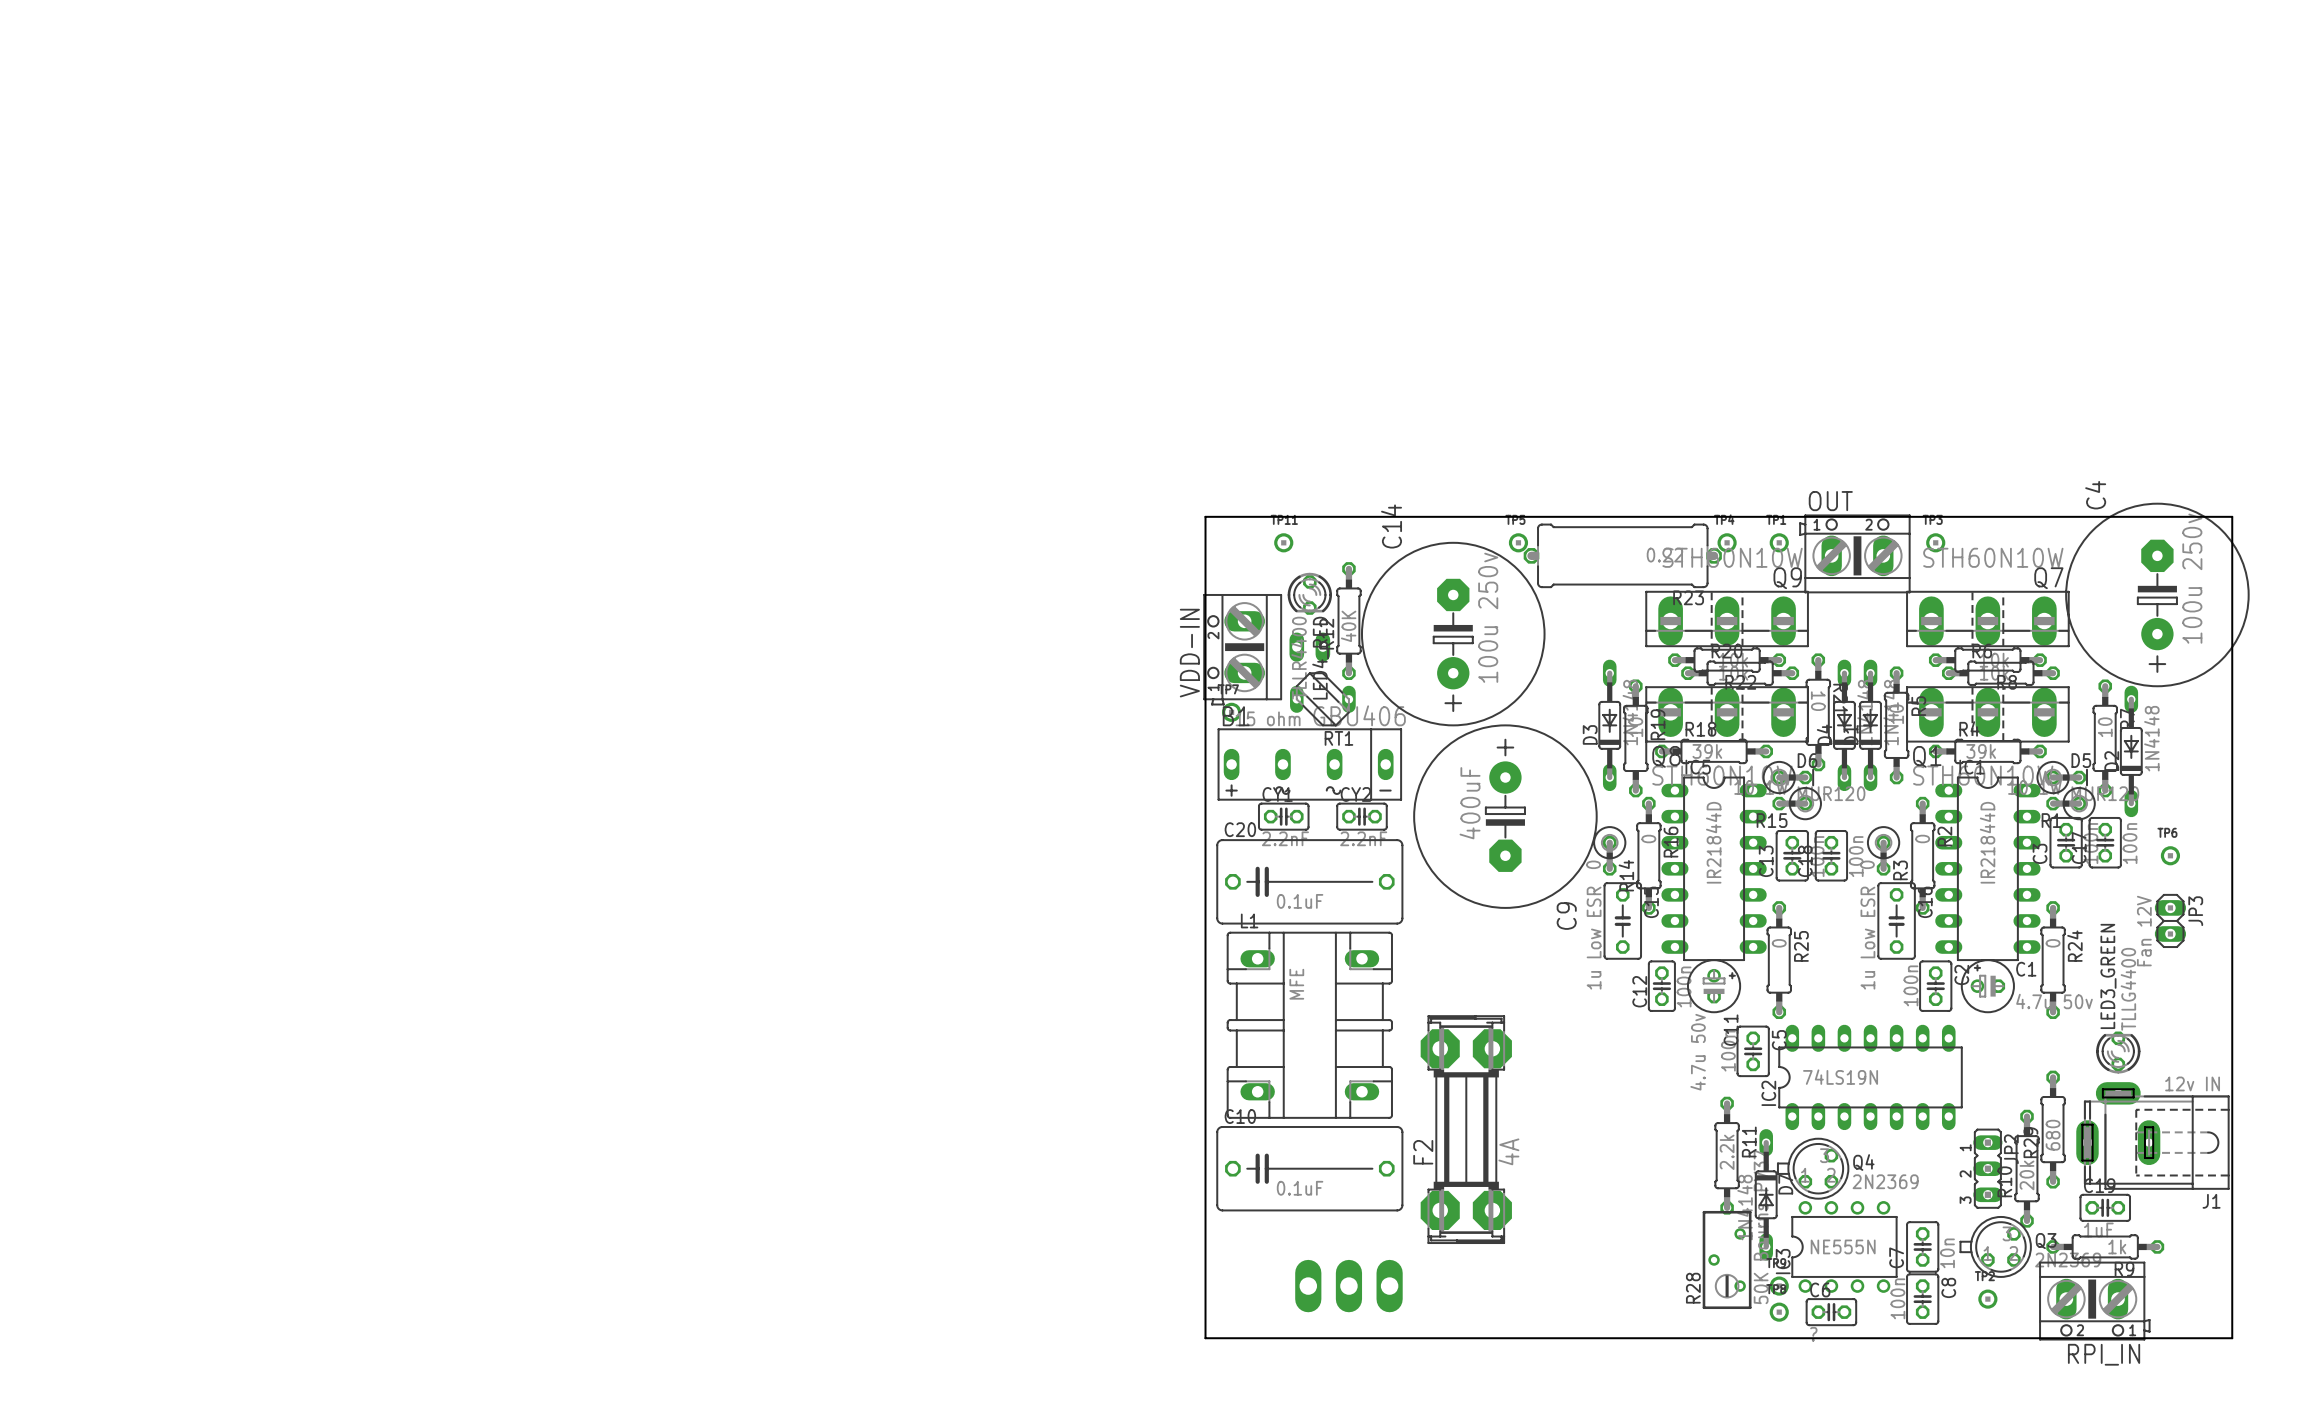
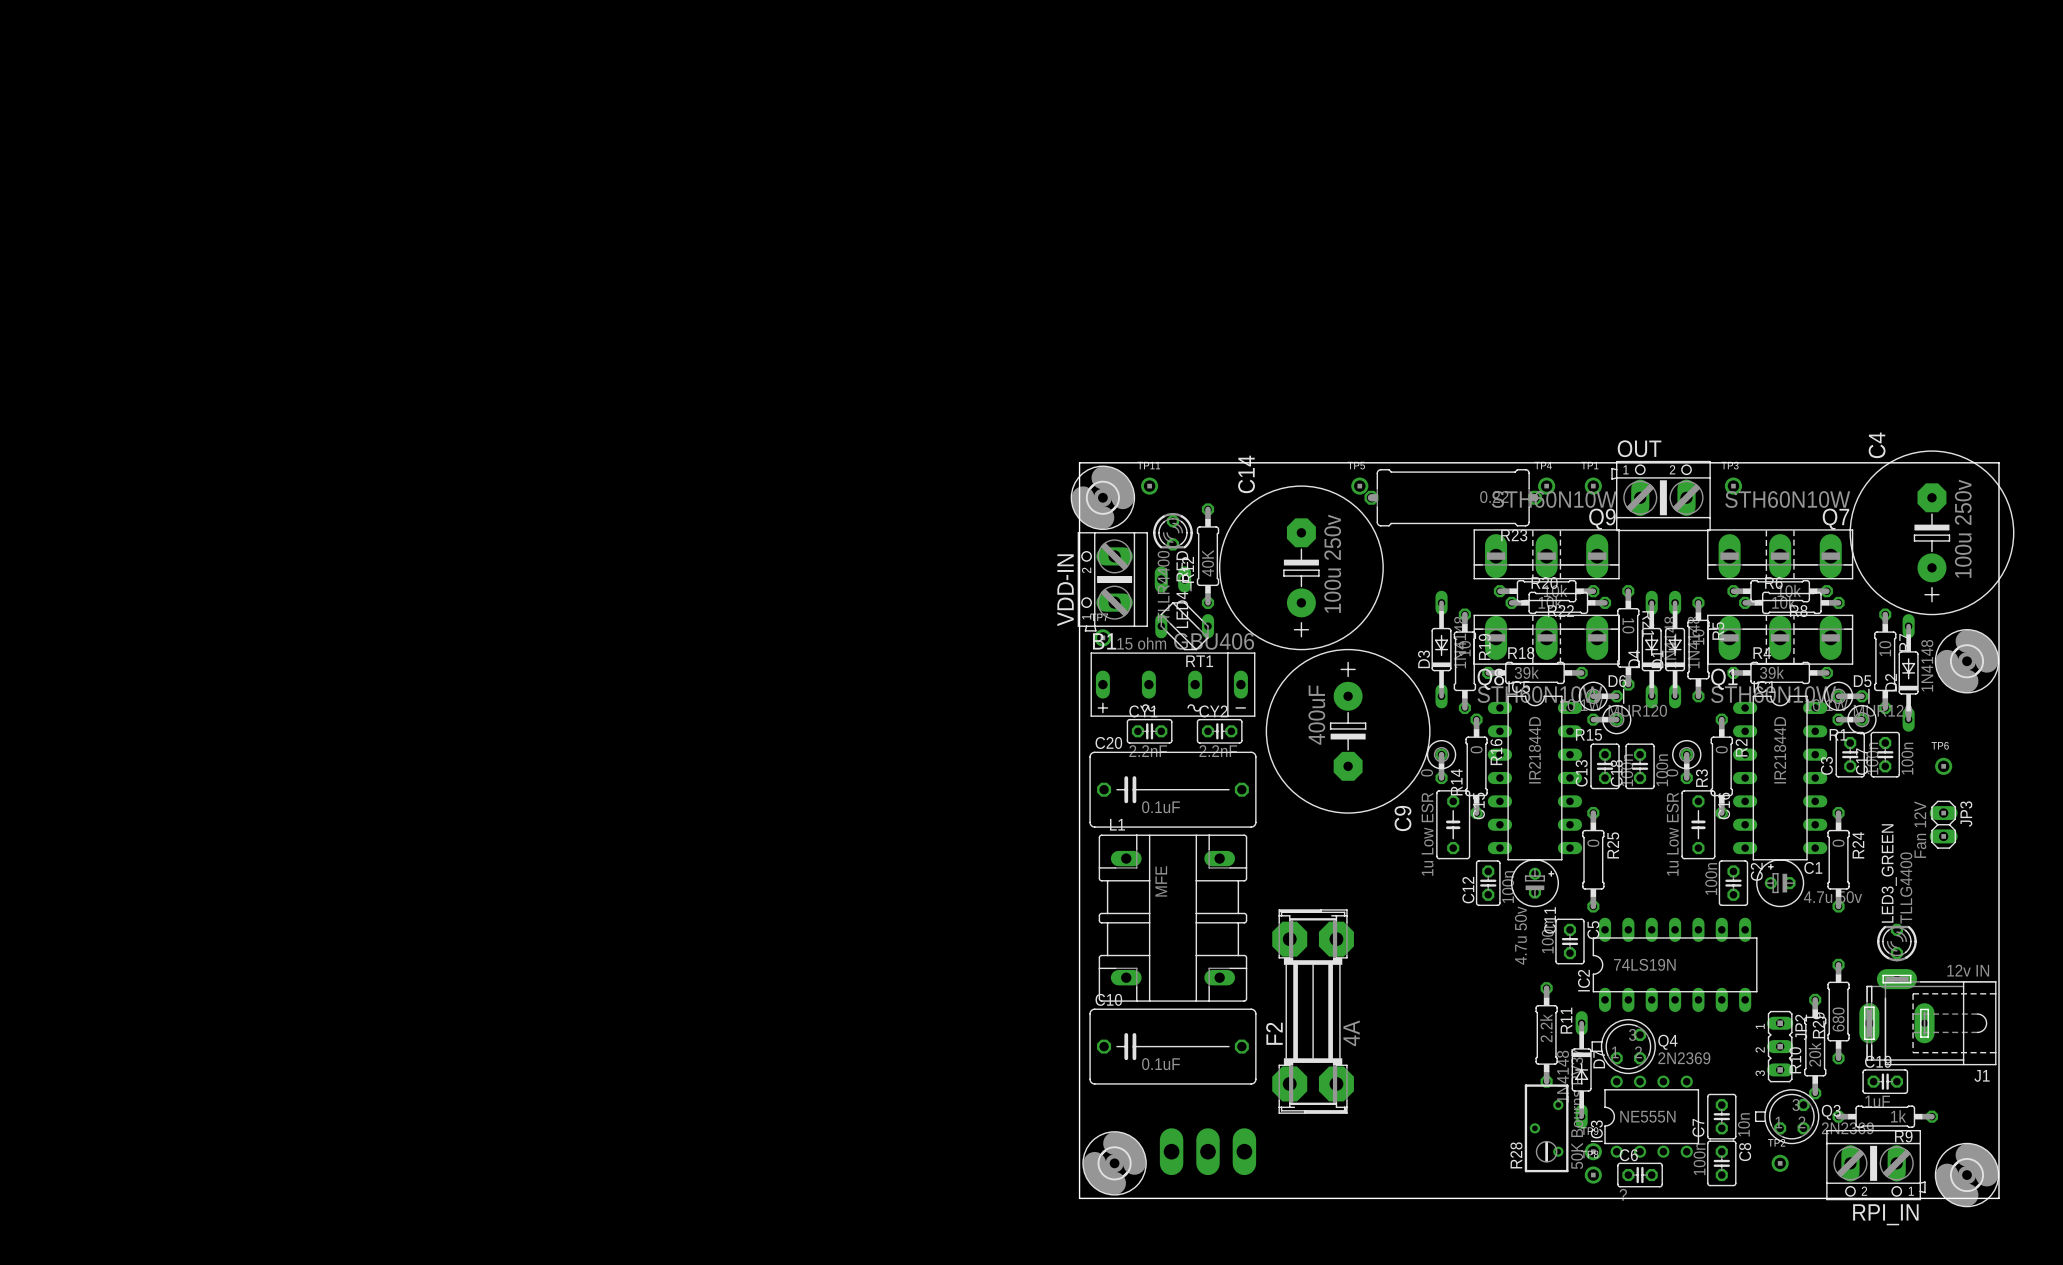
part: none -> (1102, 497)
part: none -> (1967, 661)
part: none -> (1114, 1163)
part: none -> (1967, 1175)

